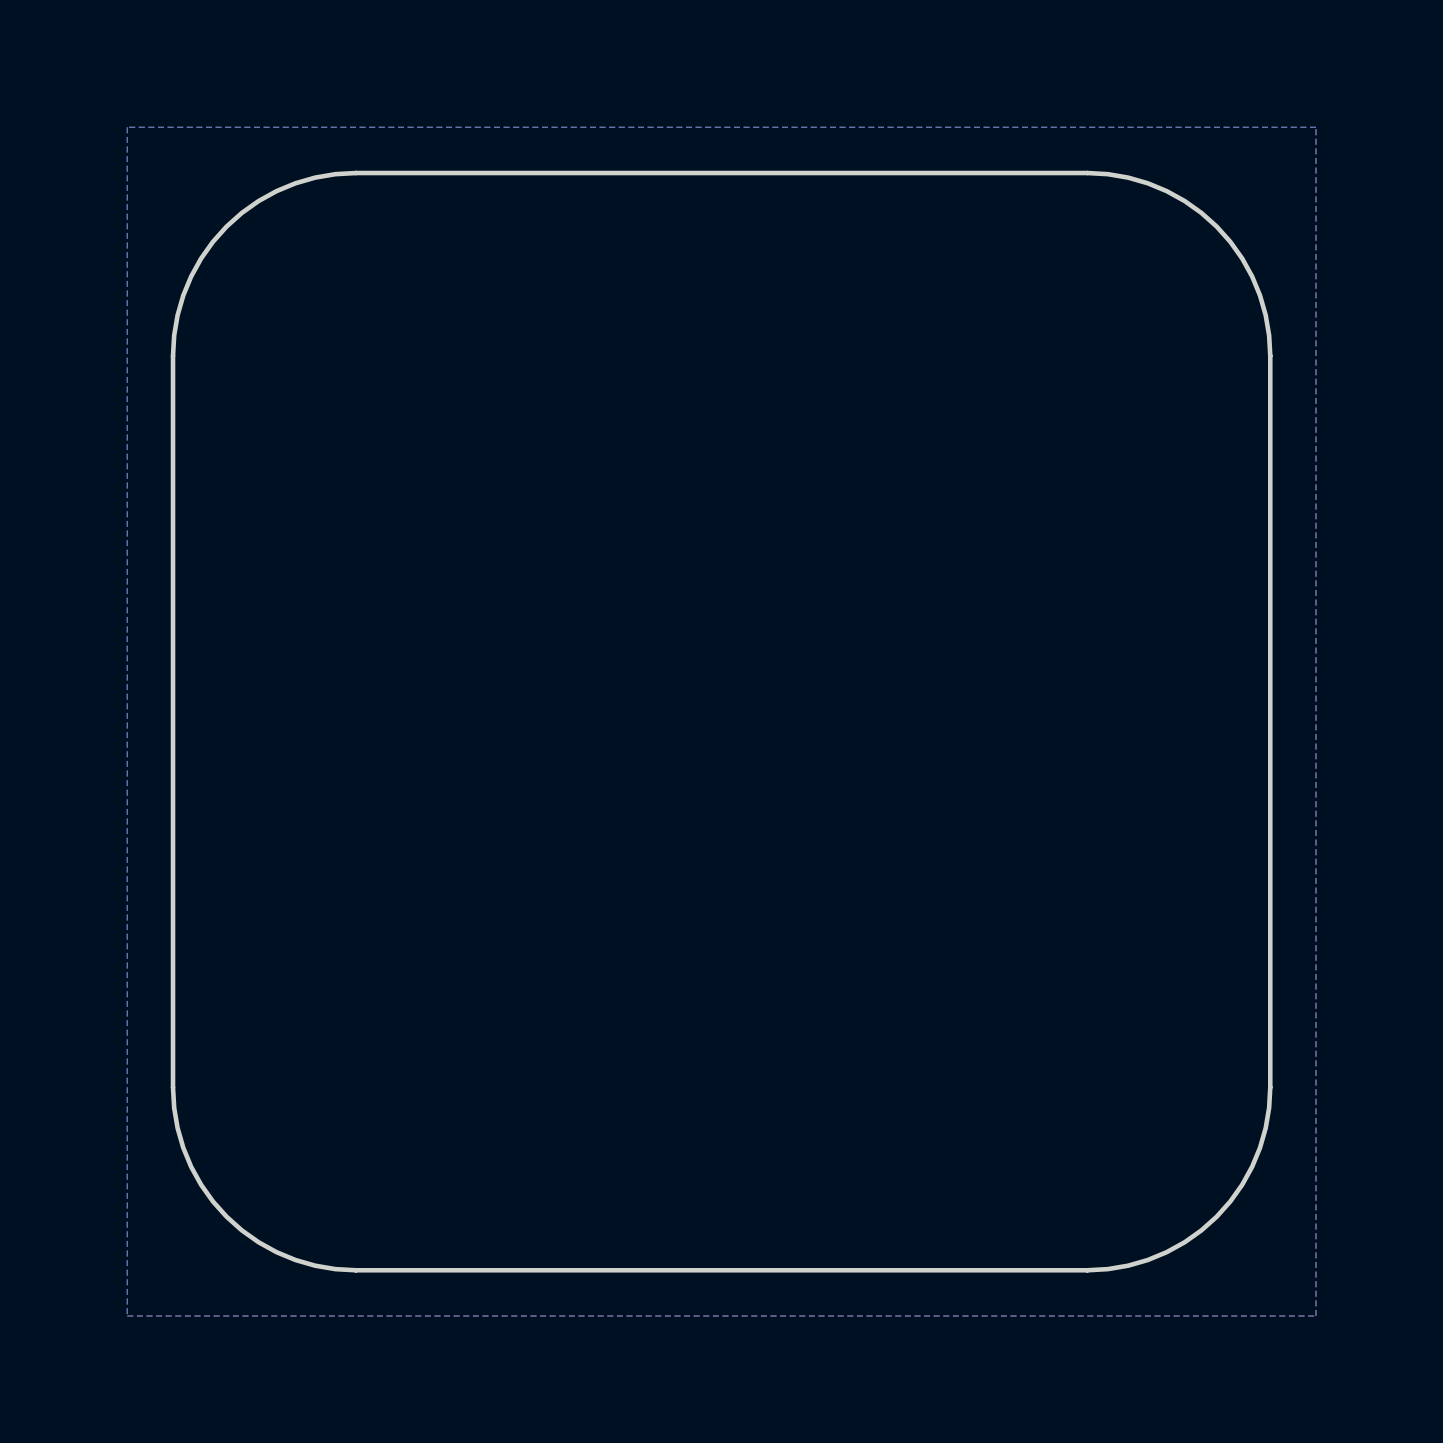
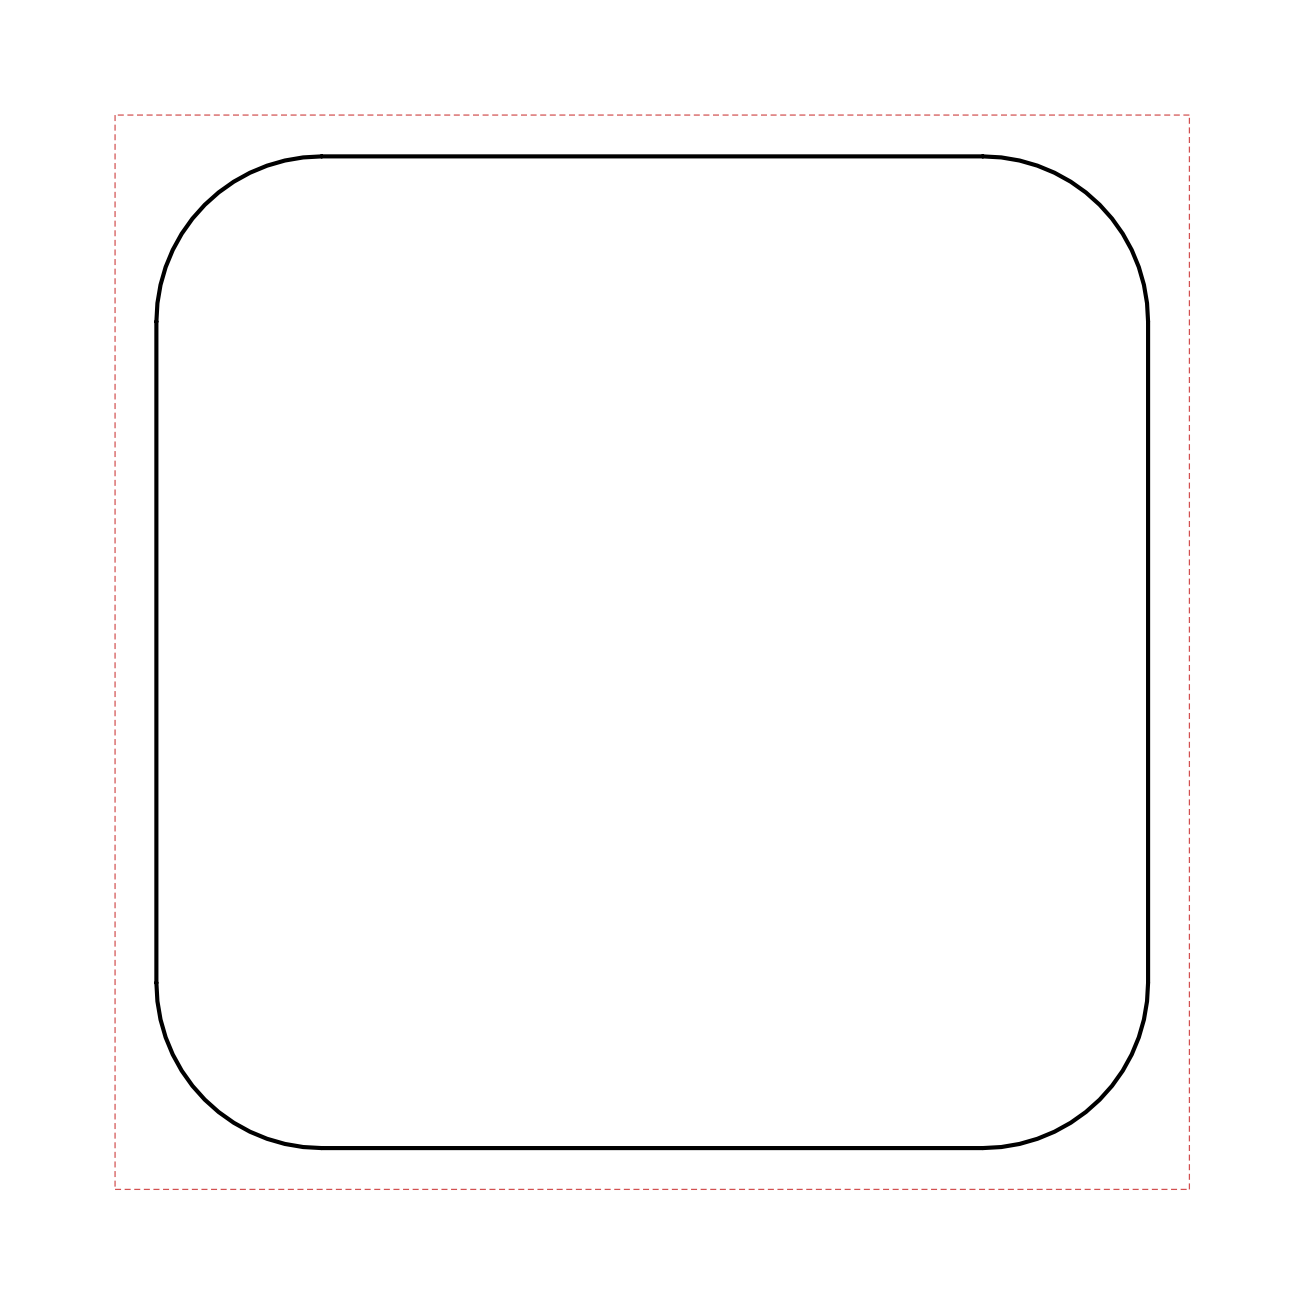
bottom zone outline: (1316, 127) (127, 127) (127, 1316) (1316, 1316) (1316, 127) -> none

